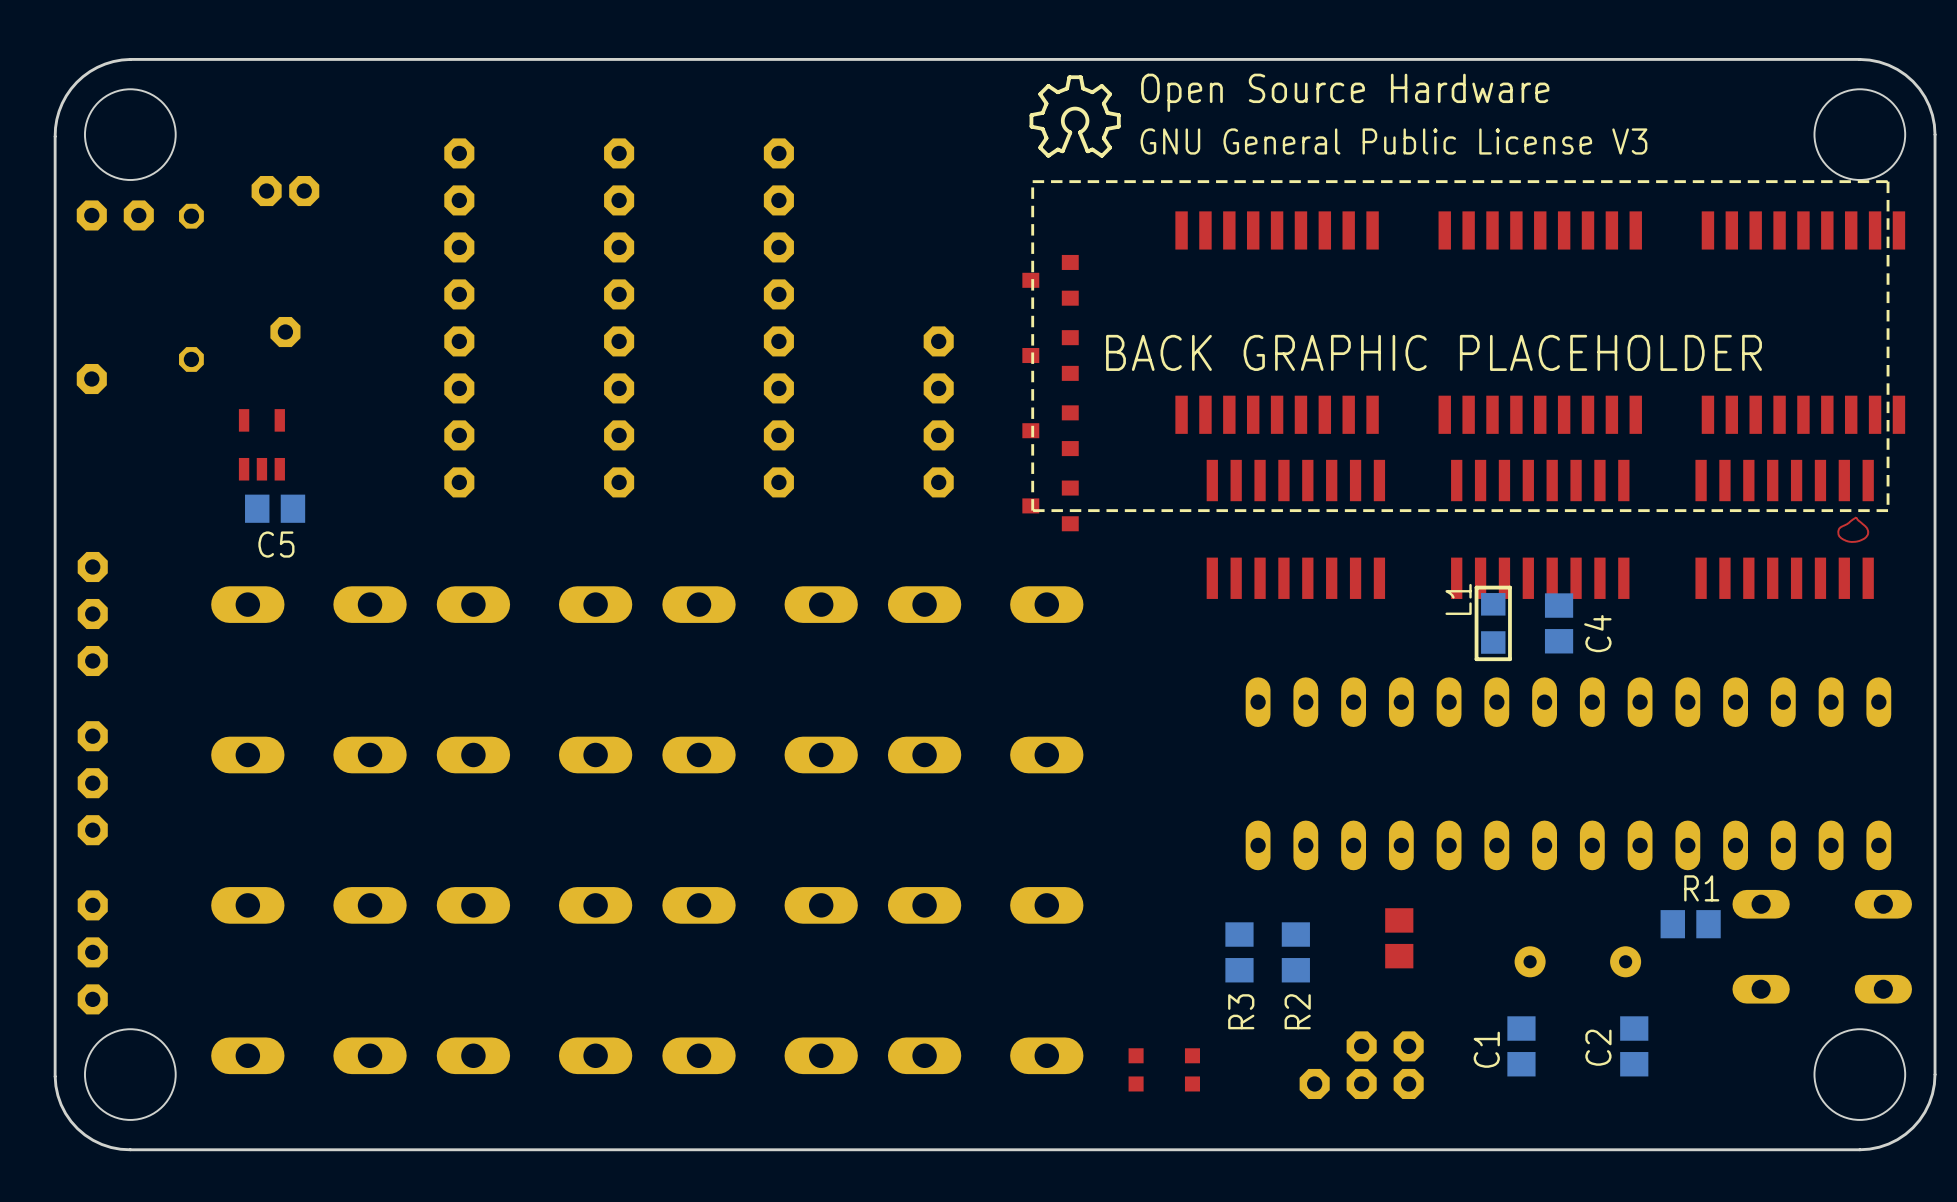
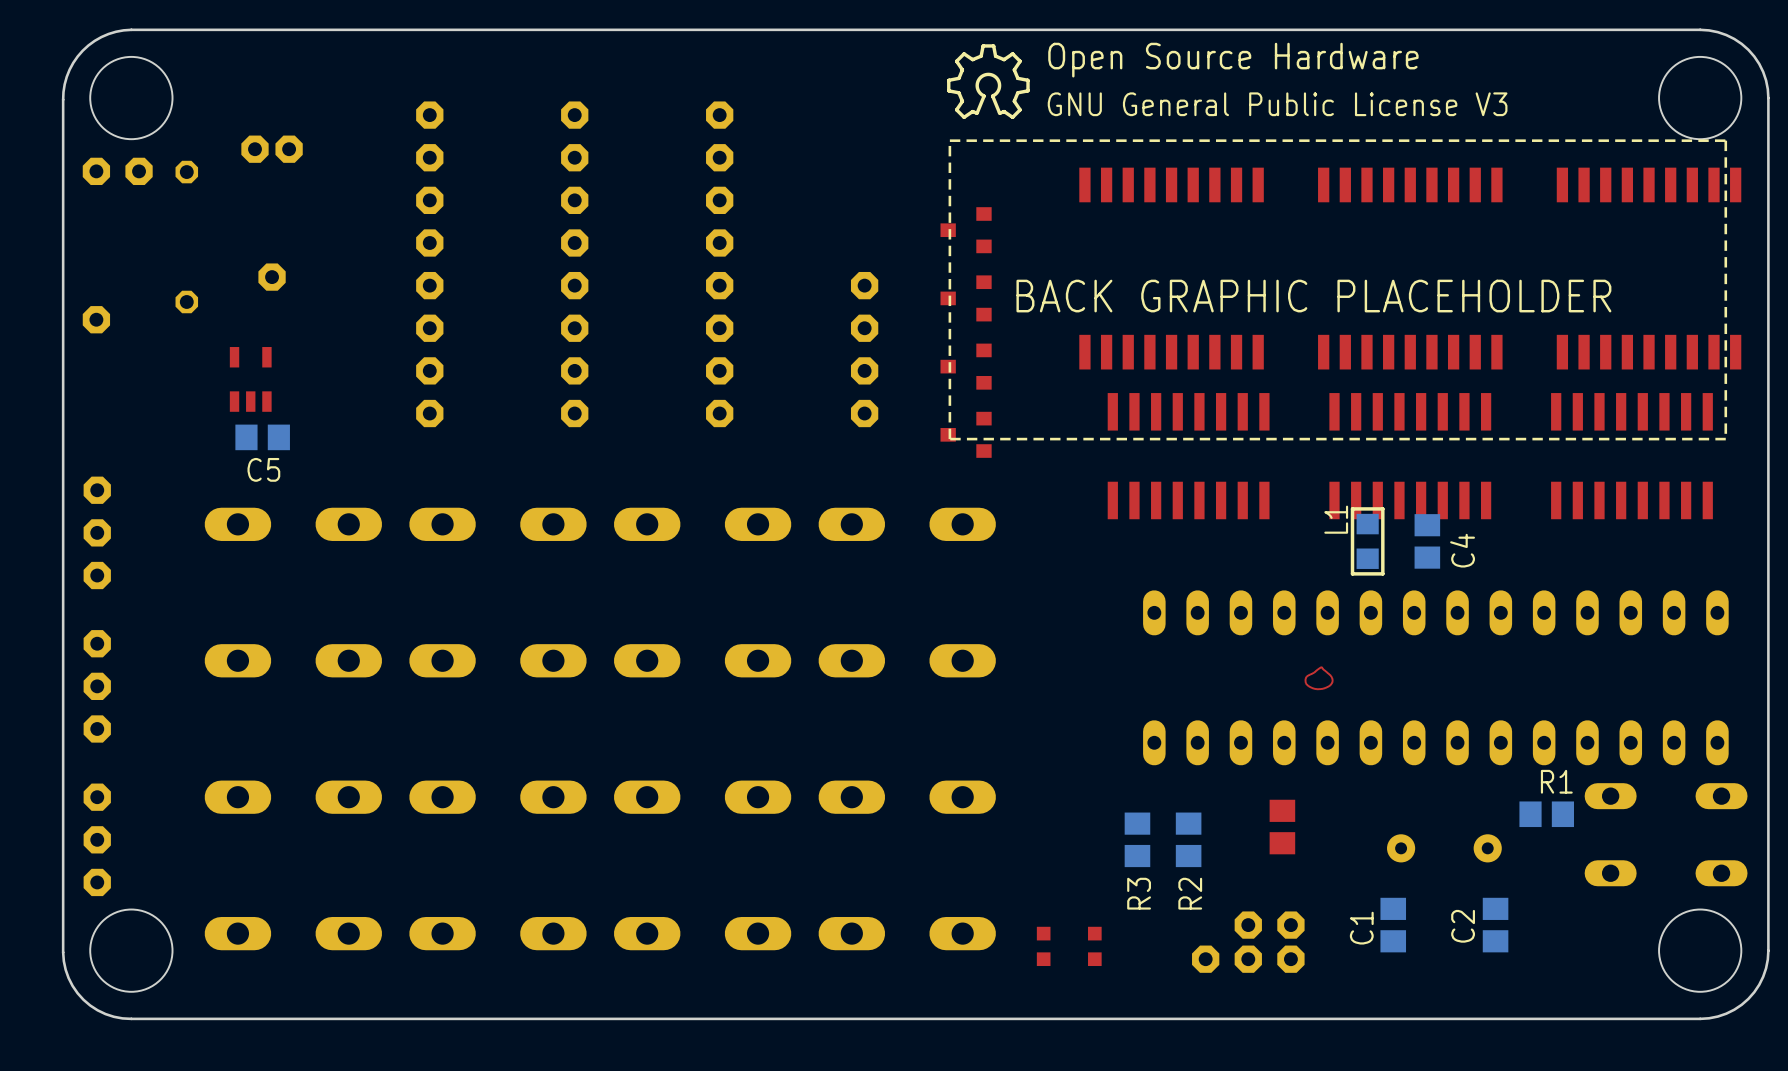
top zone outline: (1856, 517) (1867, 528) (1867, 535) (1856, 541) (1842, 538) (1838, 535) (1839, 528) (1856, 517) -> none
top zone outline: none -> (1321, 666) (1331, 677) (1331, 683) (1321, 689) (1308, 686) (1305, 683) (1306, 676) (1321, 666)

